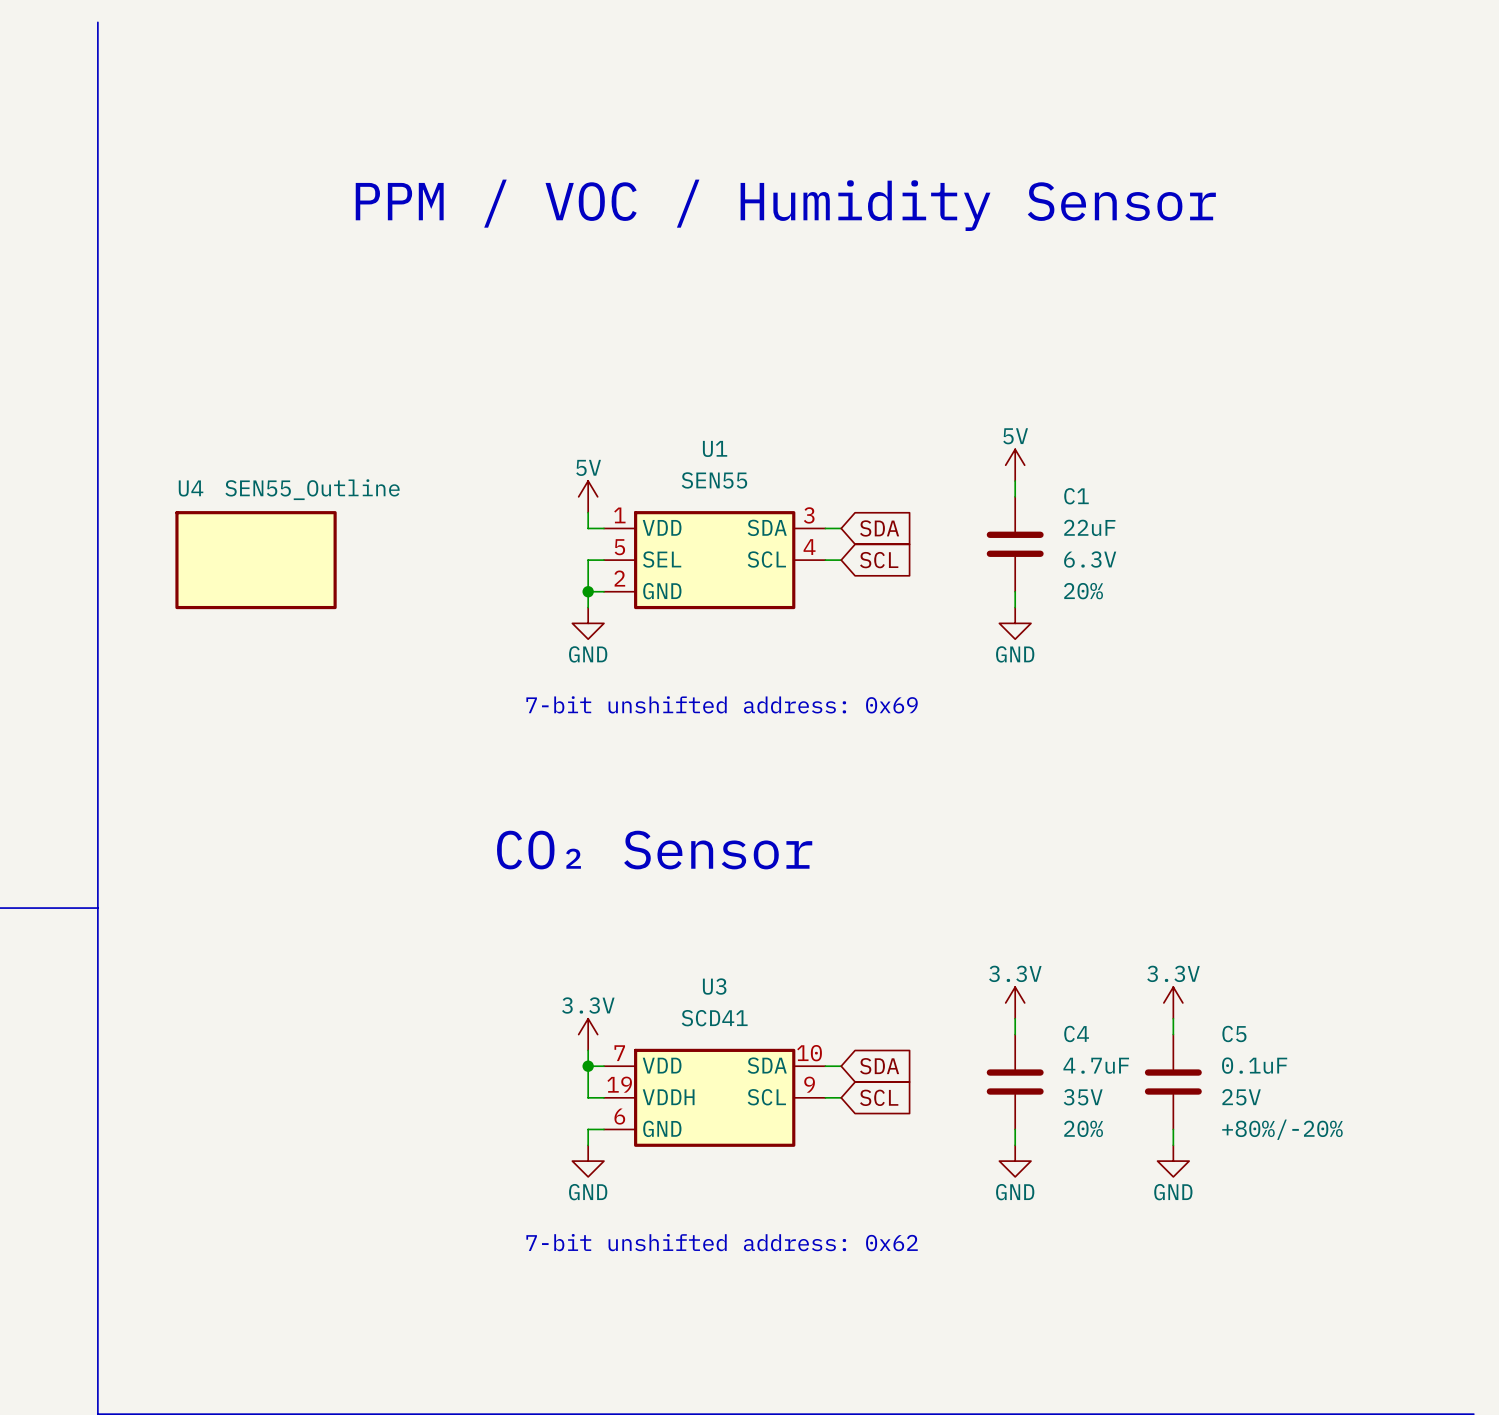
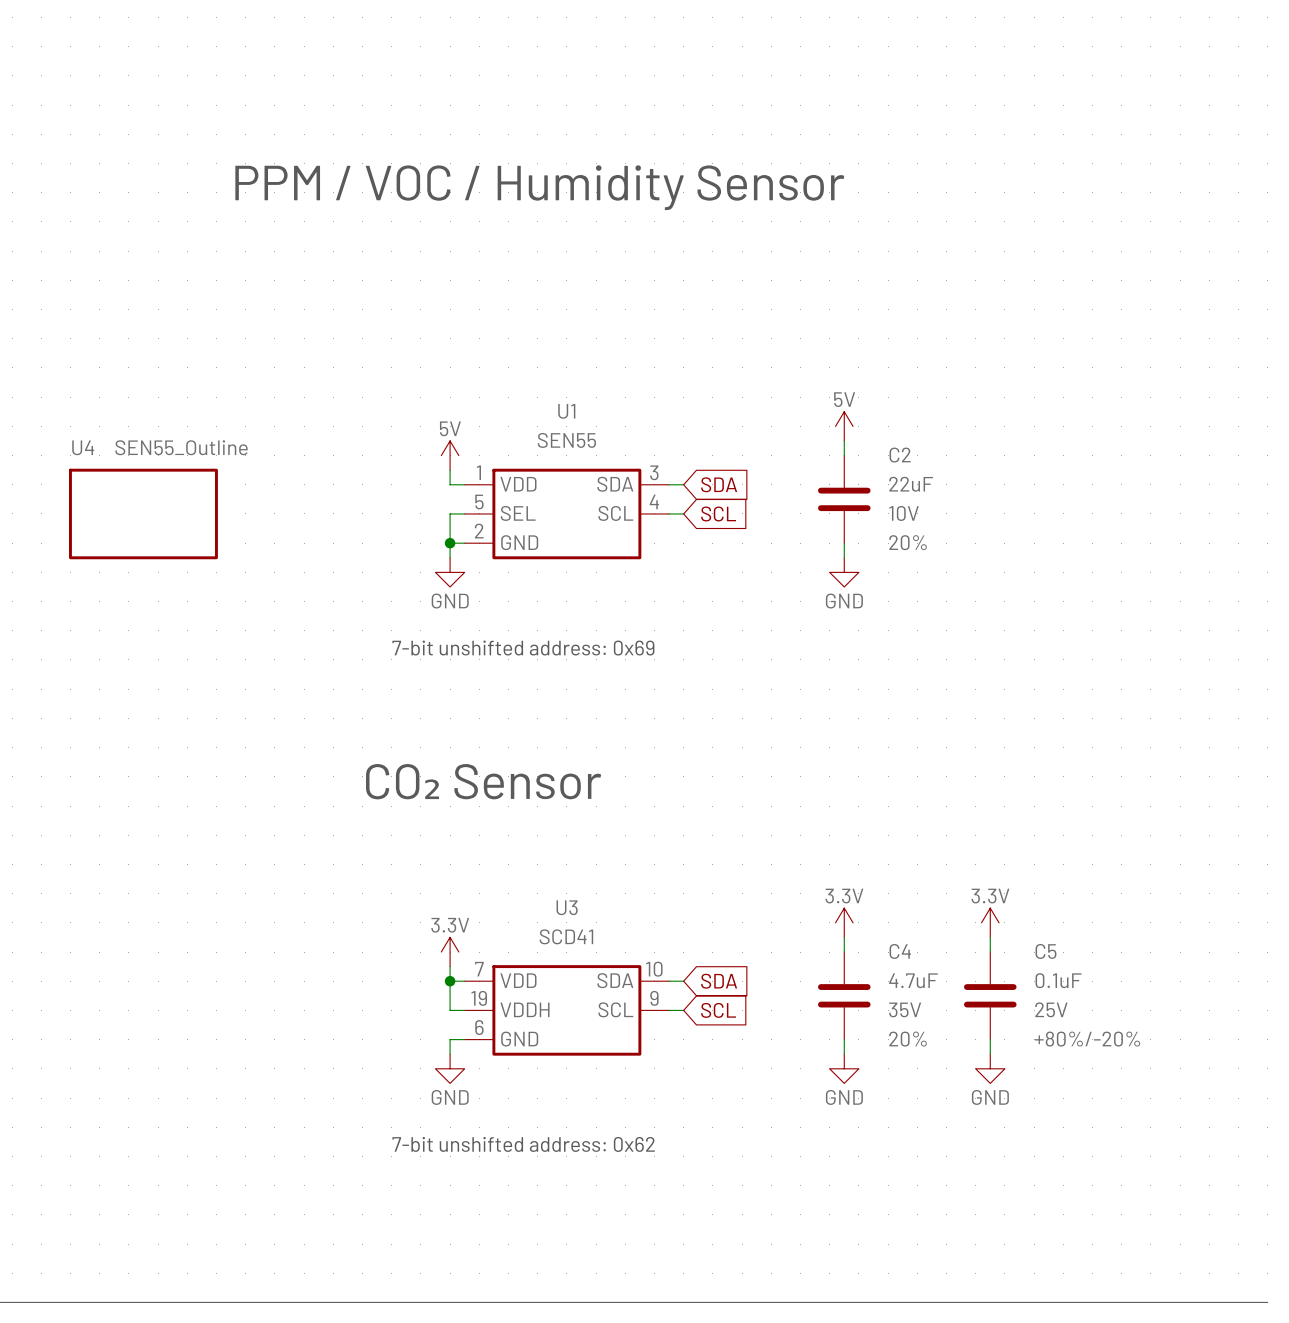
C1 name: C1 (1076, 496) -> C2 (900, 455)
C1 text: 6.3V (1090, 559) -> 10V (904, 513)

